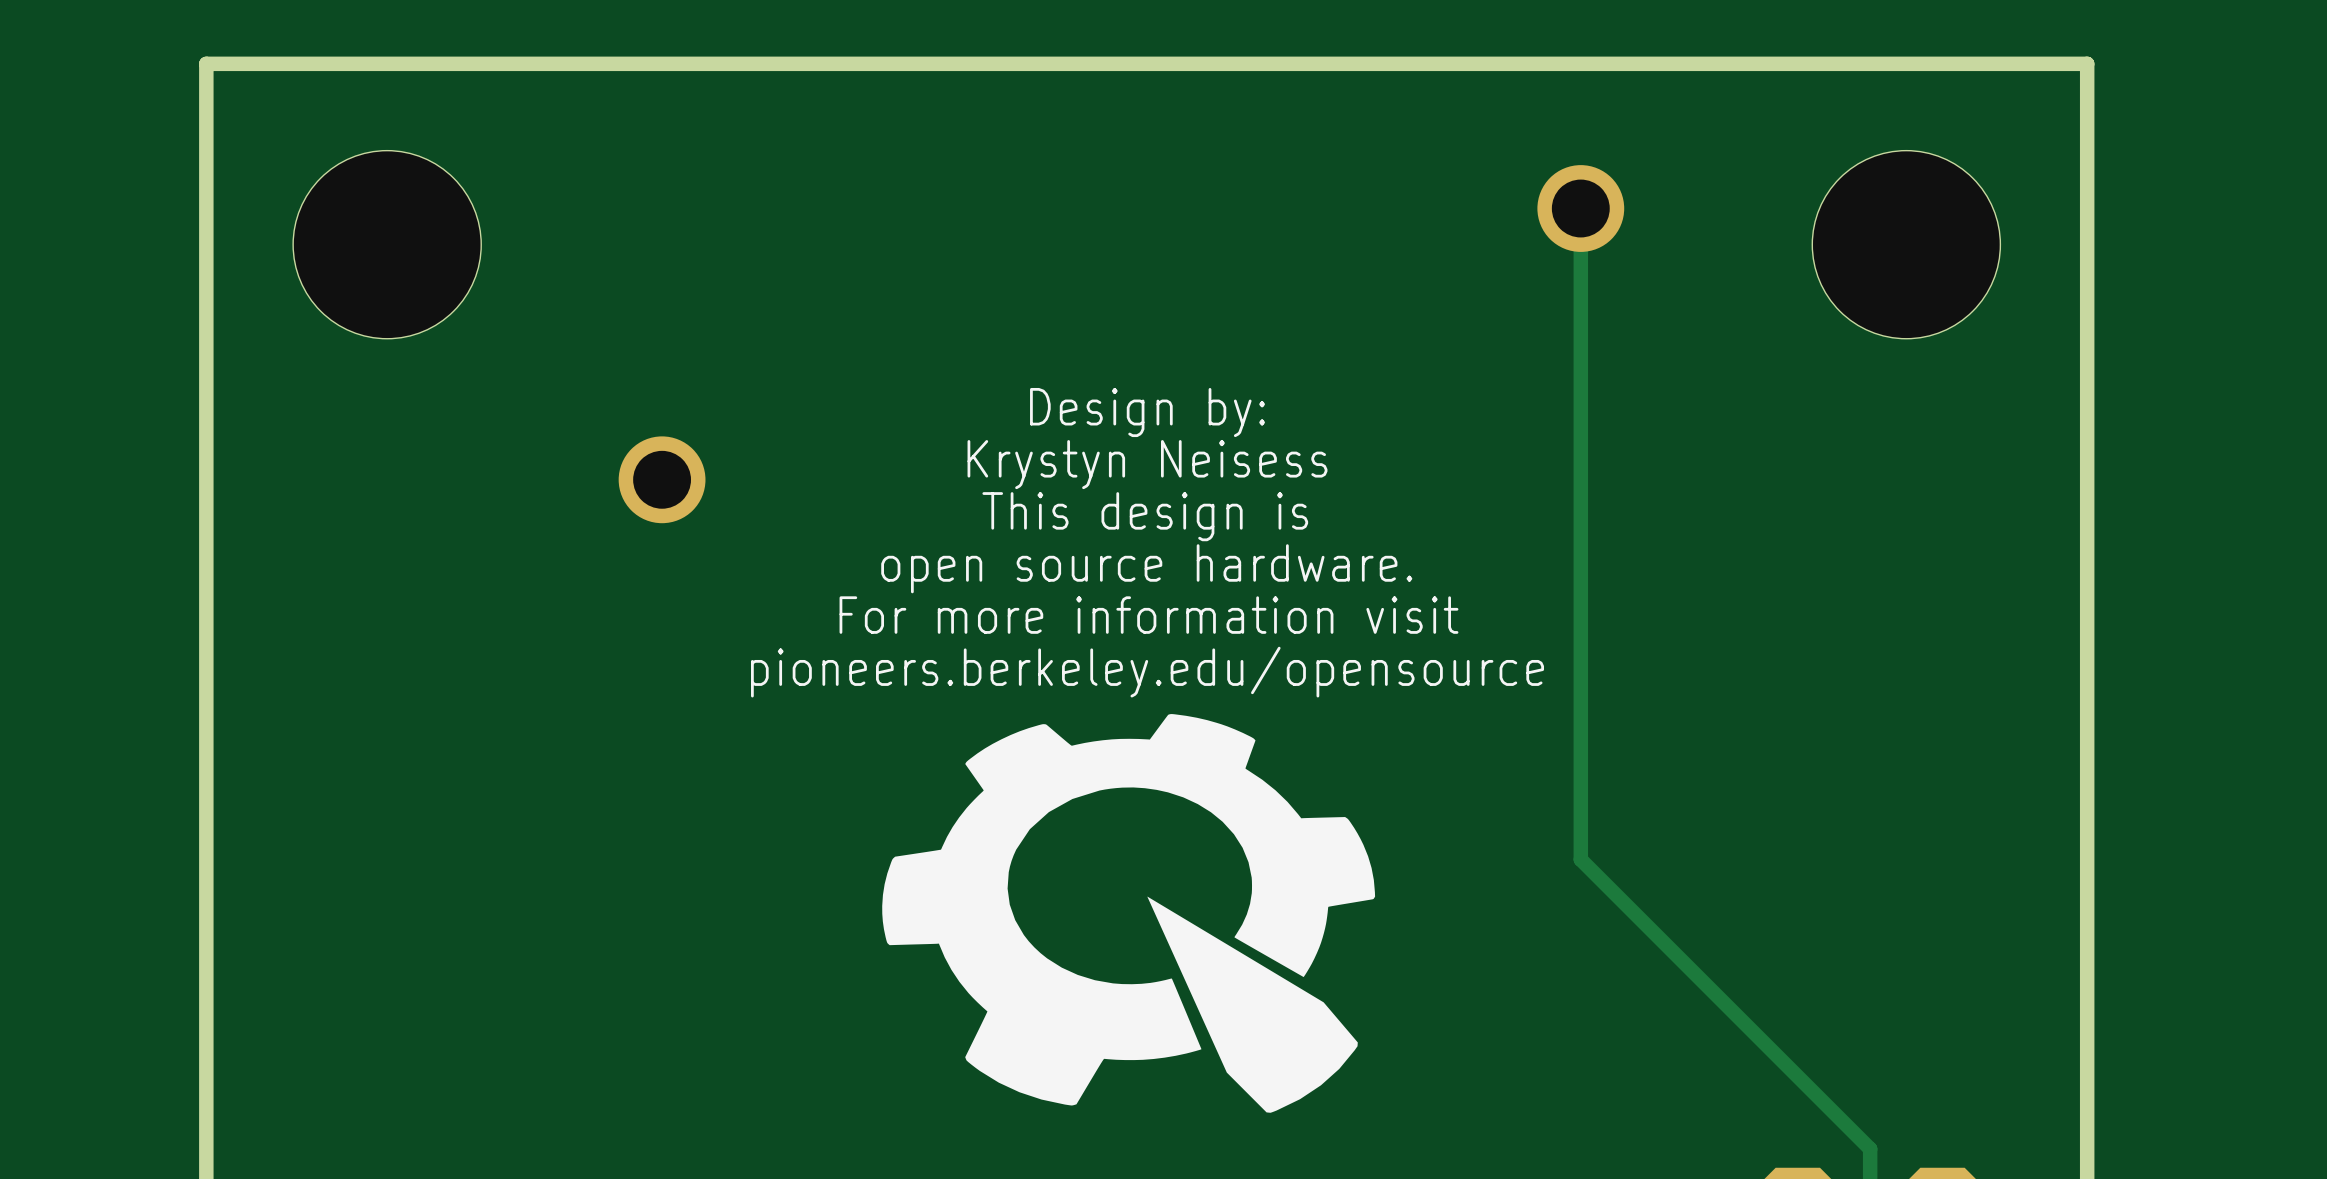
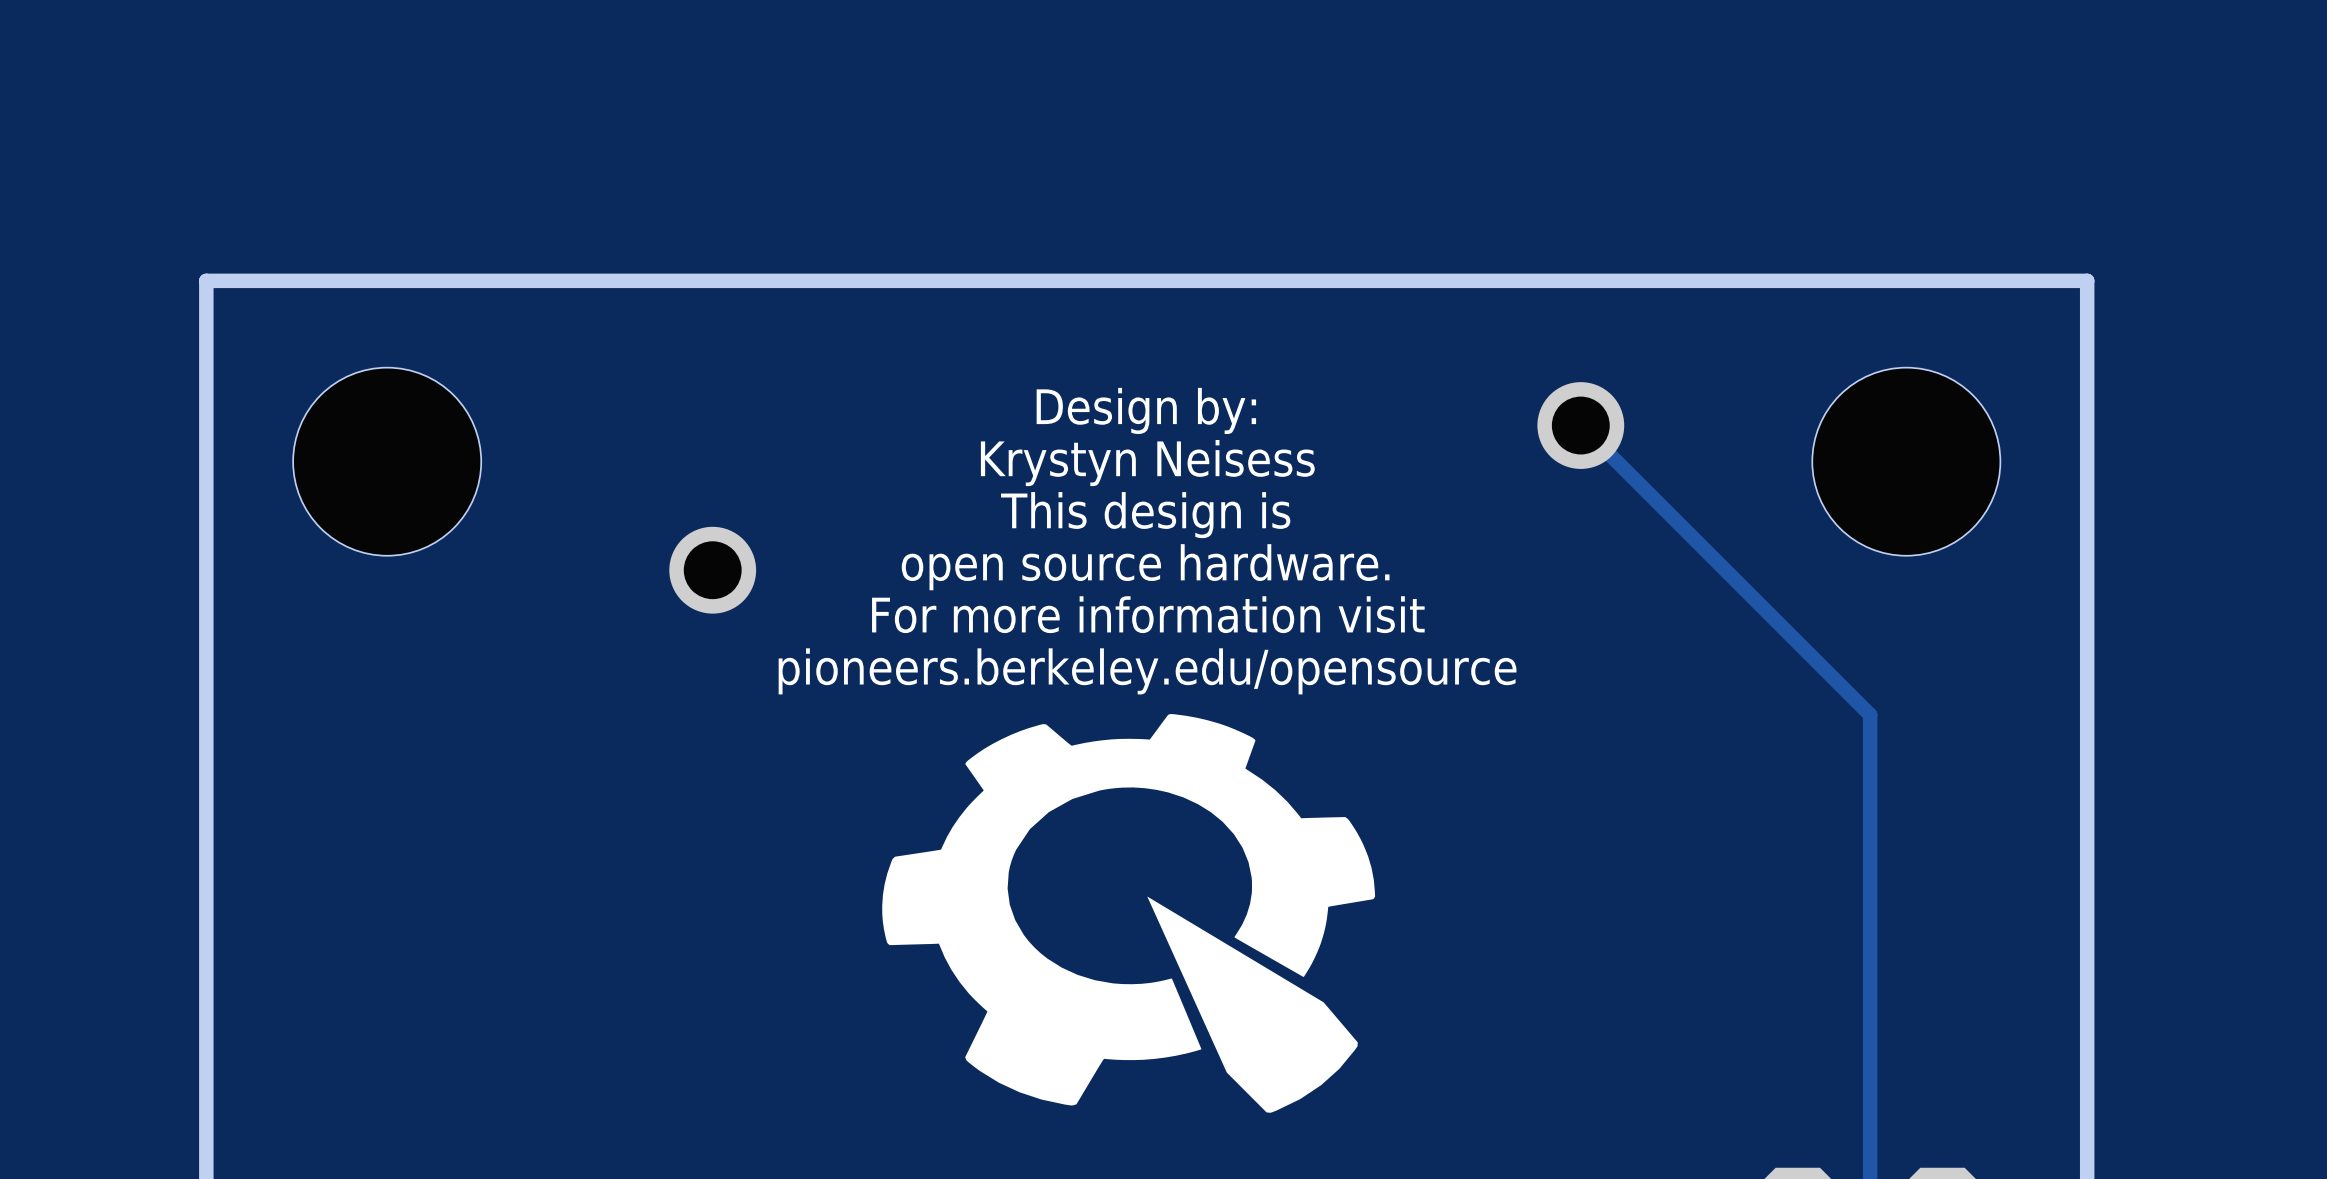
track: (1580, 208) (1580, 859) (1870, 1148) -> (1580, 425) (1870, 714) (1870, 1148)
part position: (1580, 208) -> (1580, 425)
part position: (387, 244) -> (387, 461)
part position: (1906, 244) -> (1906, 461)
board edge: (2087, 280) (2087, 63) (206, 63) (206, 280) -> (2087, 280) (206, 280)
part position: (662, 479) -> (712, 570)

